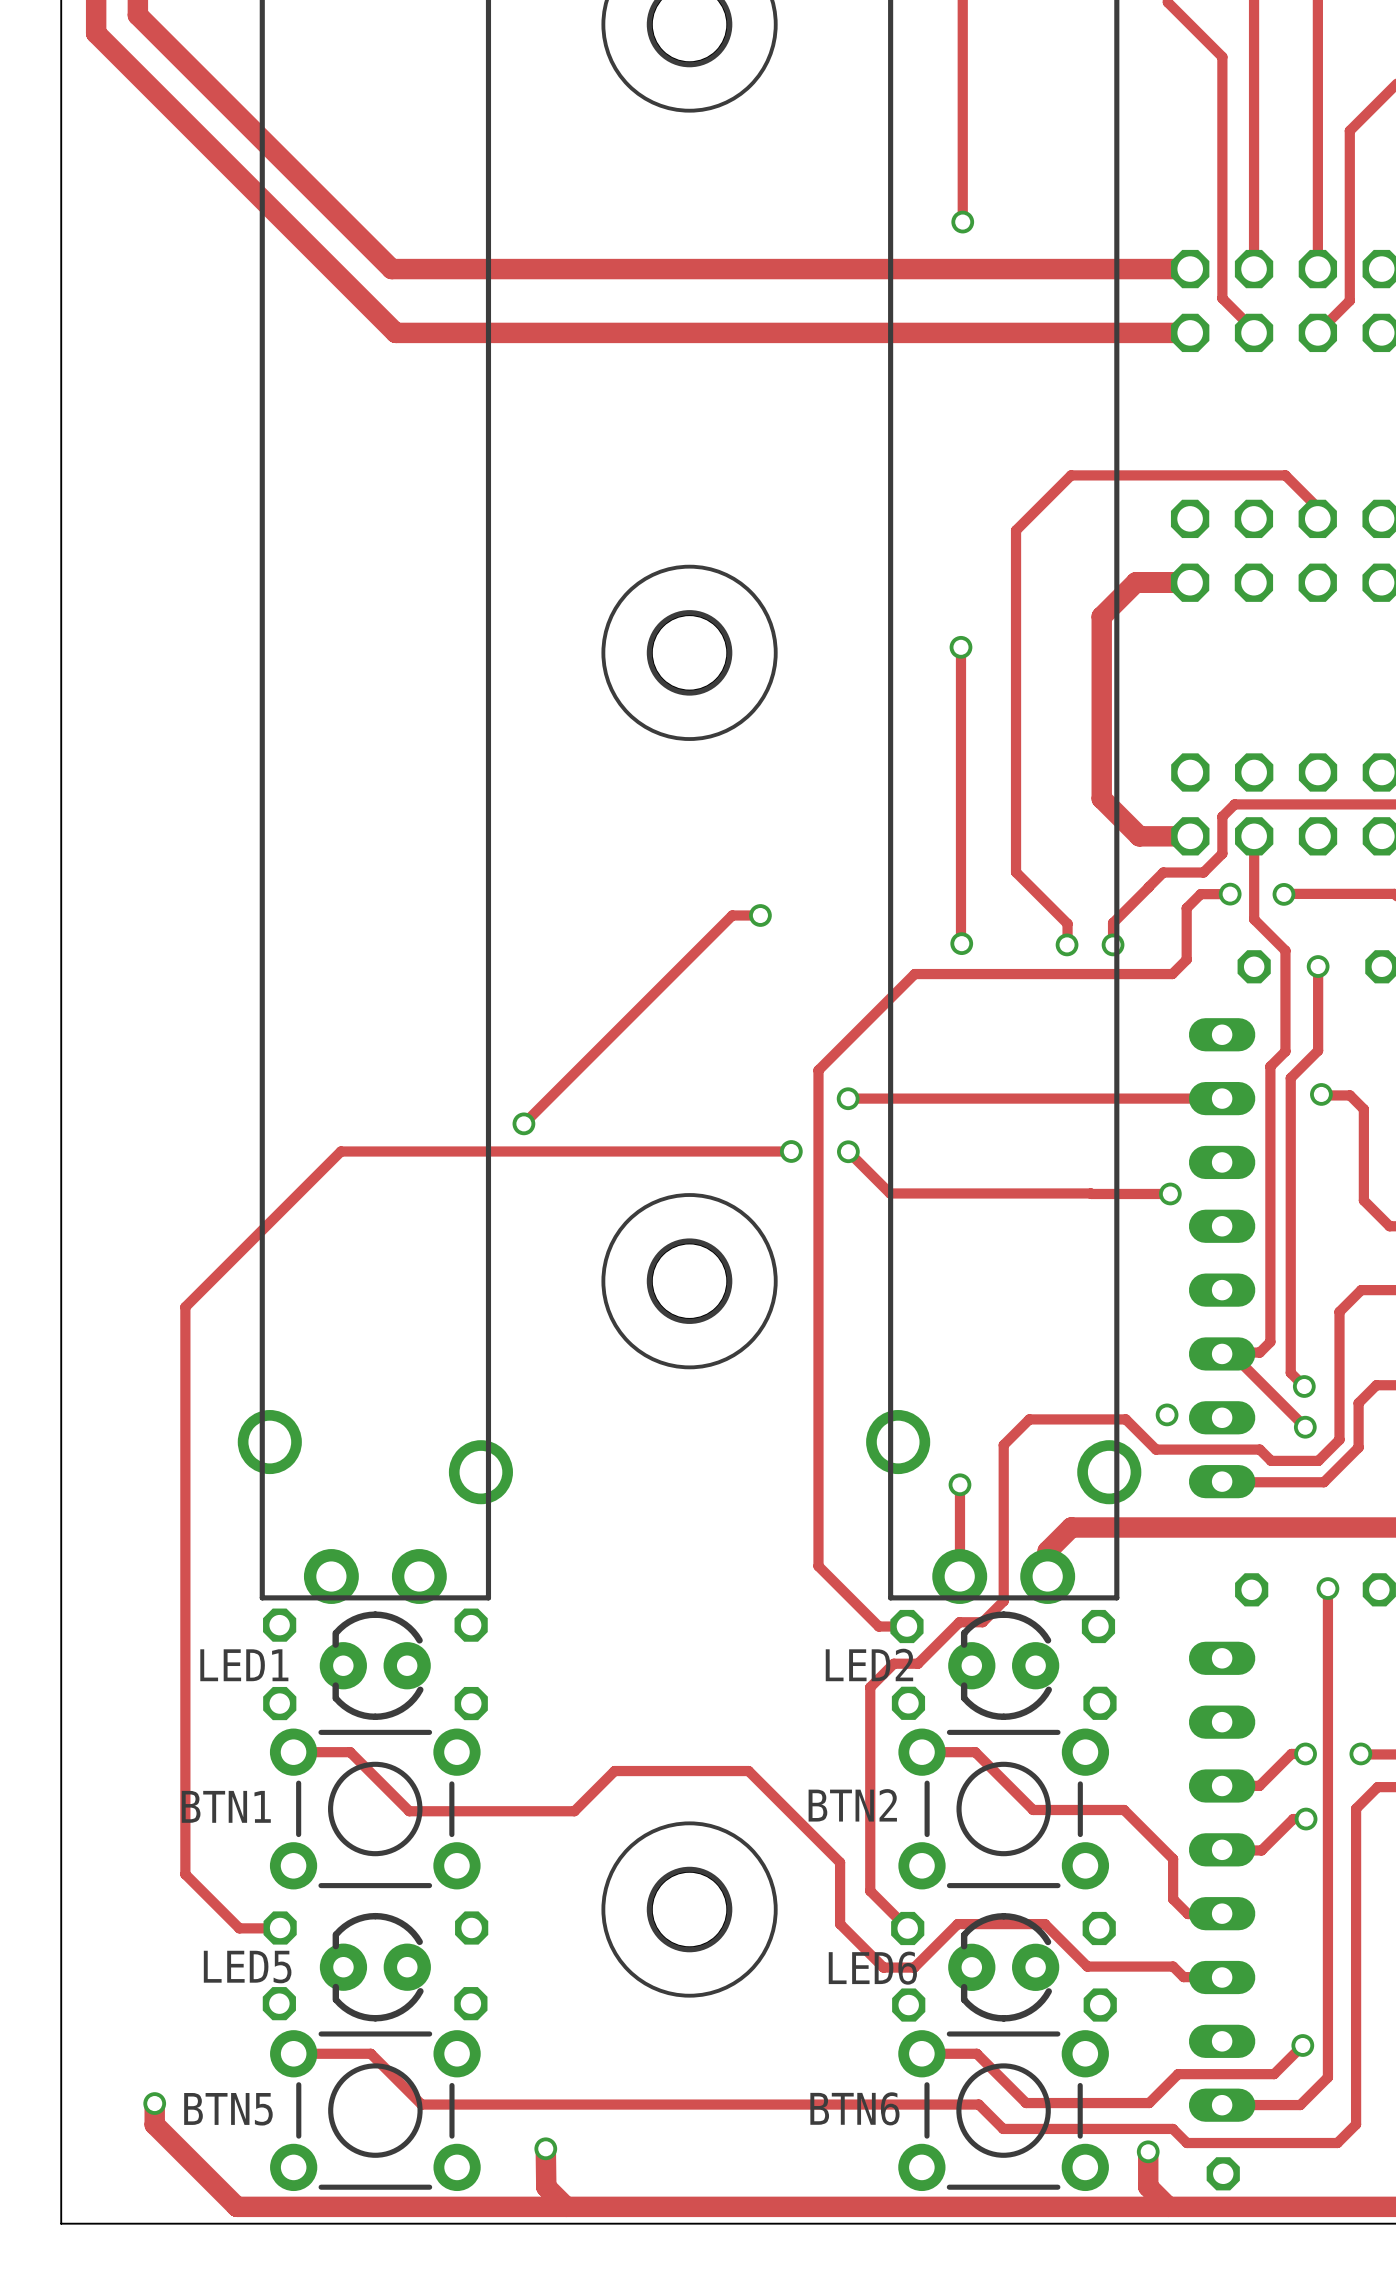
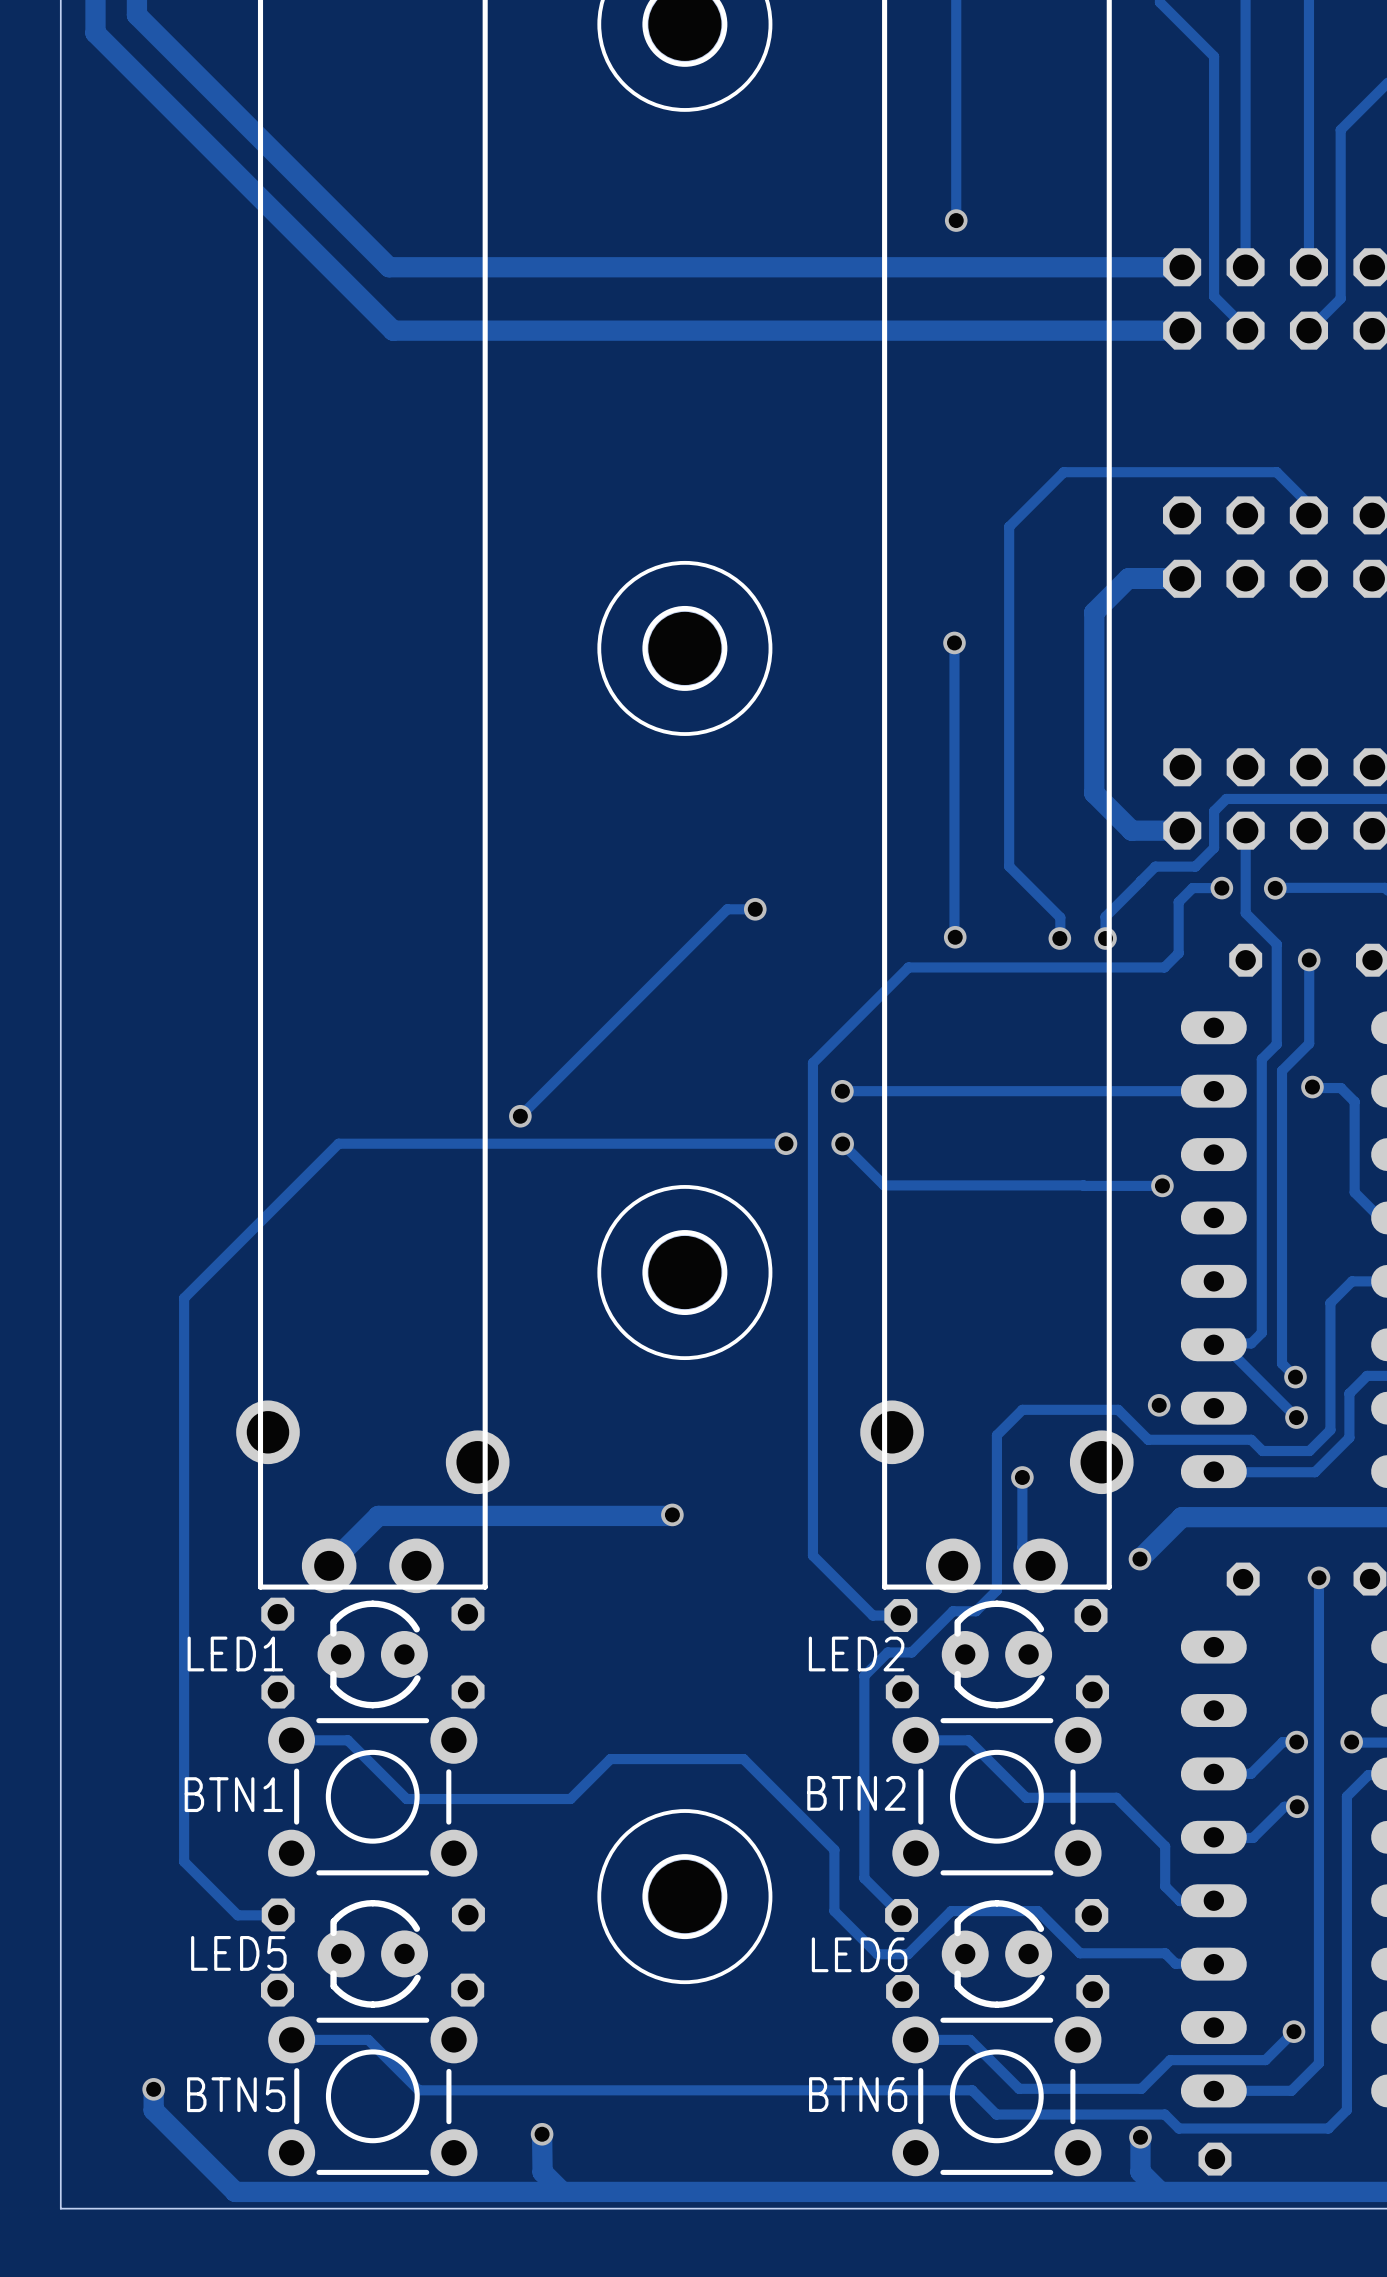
track: (959, 1484) (959, 1576) -> none
via position: (959, 1484) -> (1022, 1477)
track: none -> (1022, 1477) (1022, 1547) (1040, 1565)
track: none -> (672, 1514) (378, 1515) (329, 1565)
via: none -> (672, 1514)
track: (1189, 1527) (1071, 1527) (1047, 1551) (1047, 1576) -> (1181, 1517) (1139, 1559)
via: none -> (1139, 1559)

